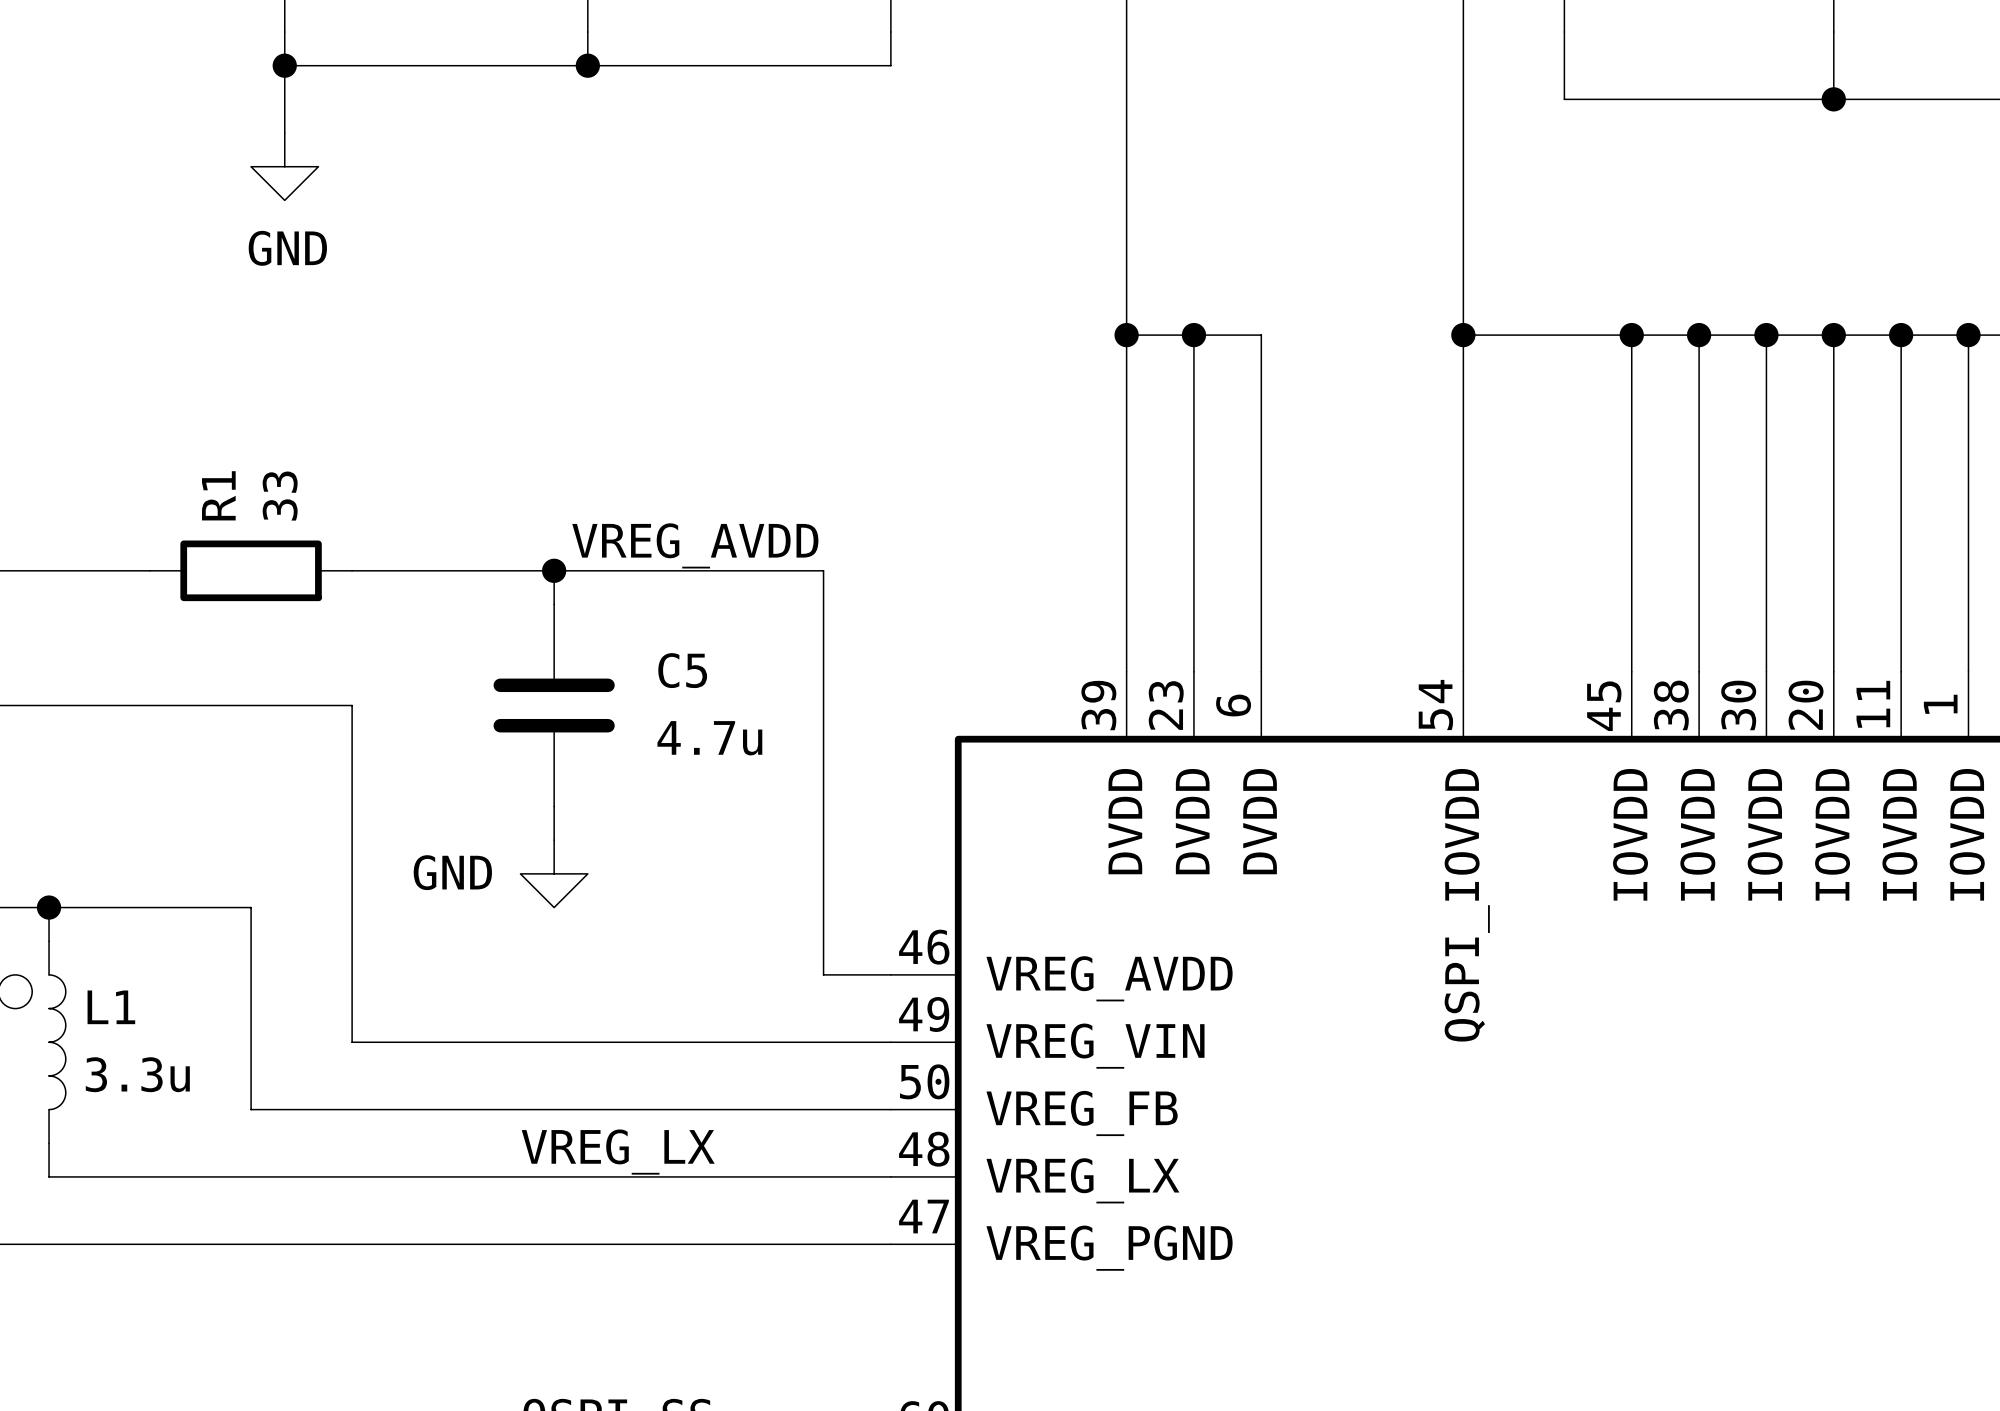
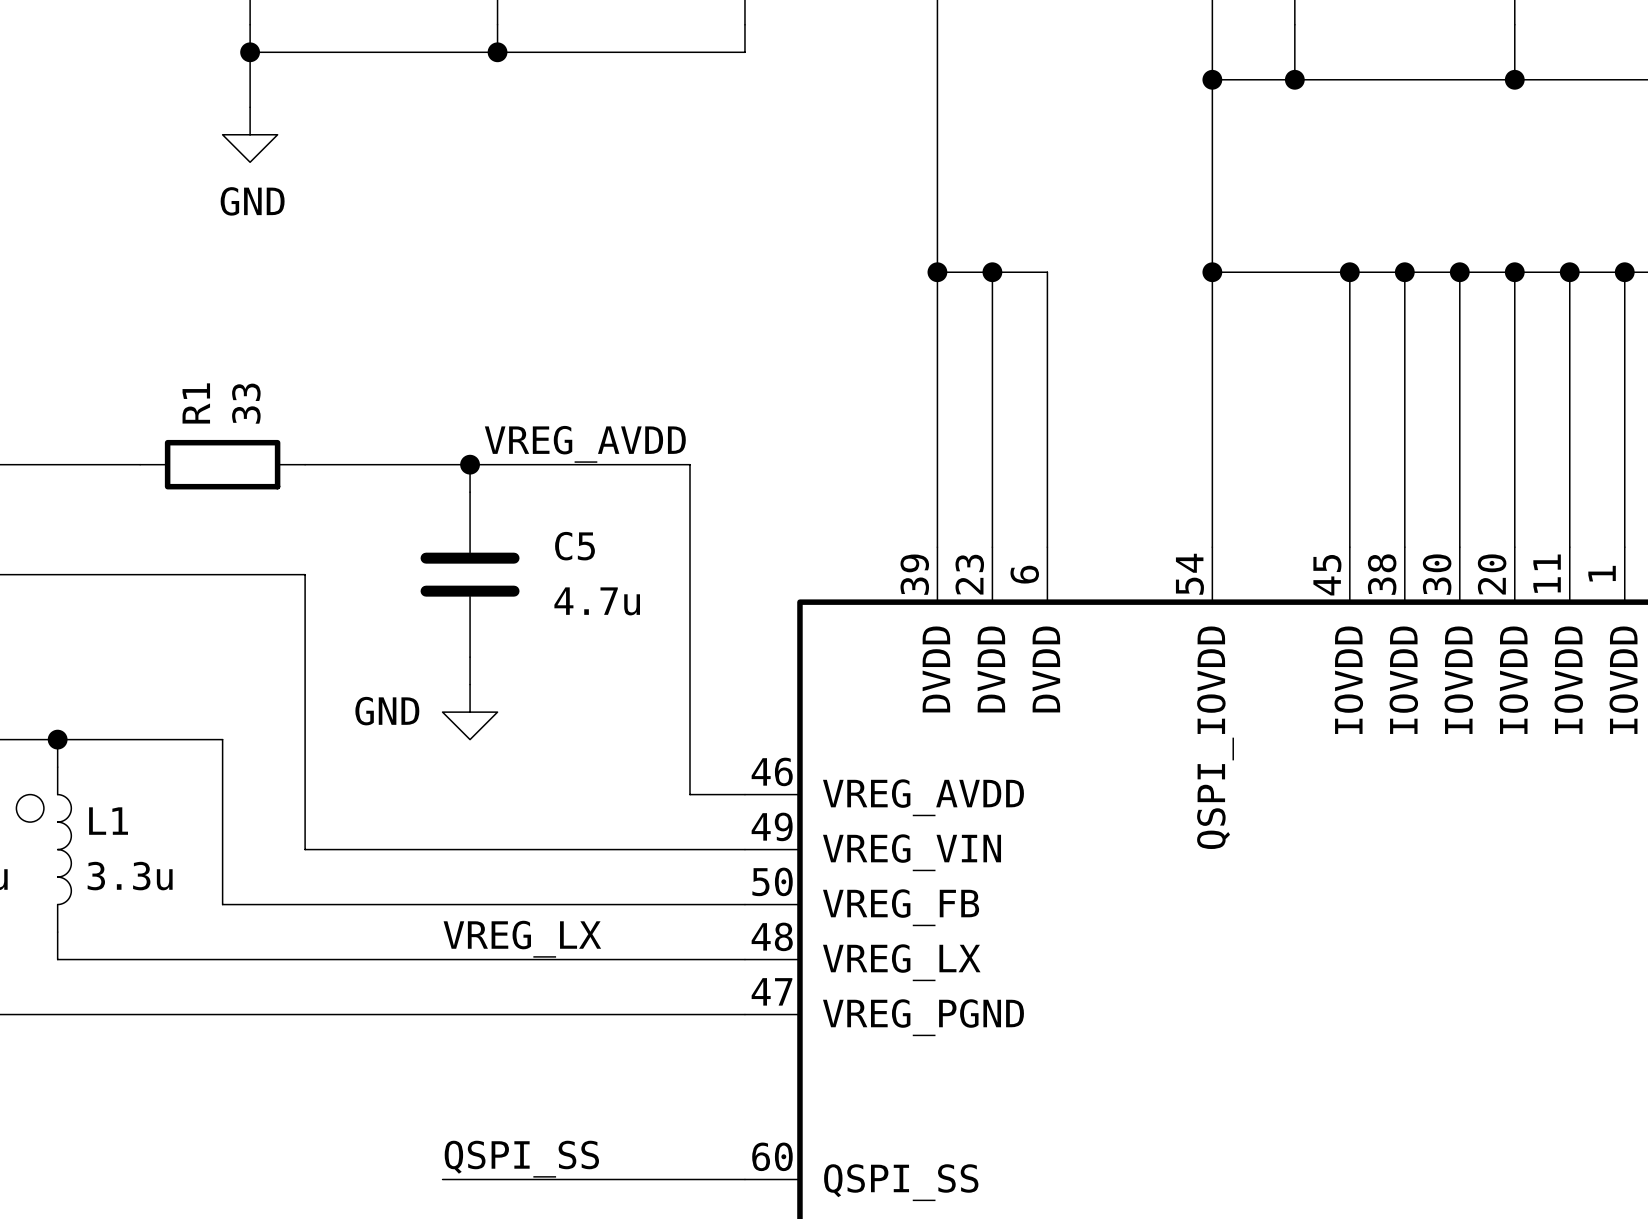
wire: none -> (1212, 79) (1294, 79)
junction: none -> (1212, 79)
junction: none -> (1294, 79)

